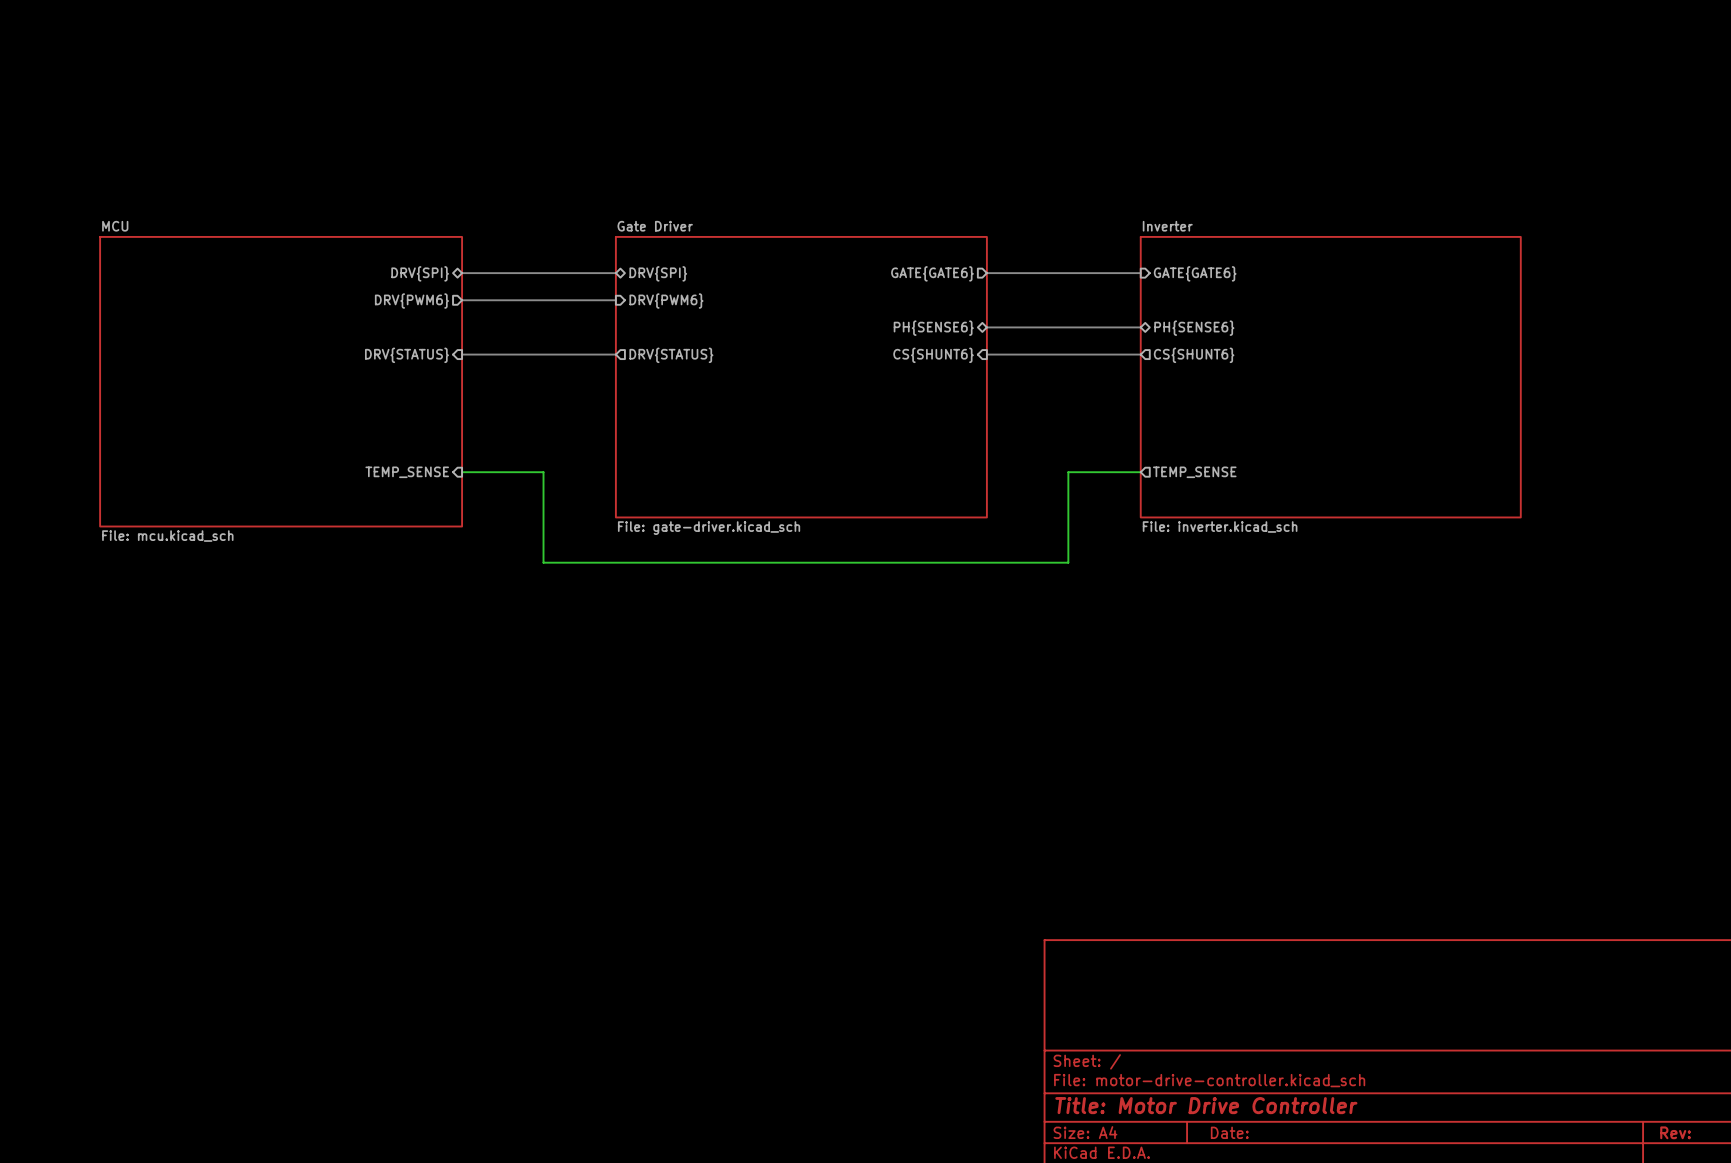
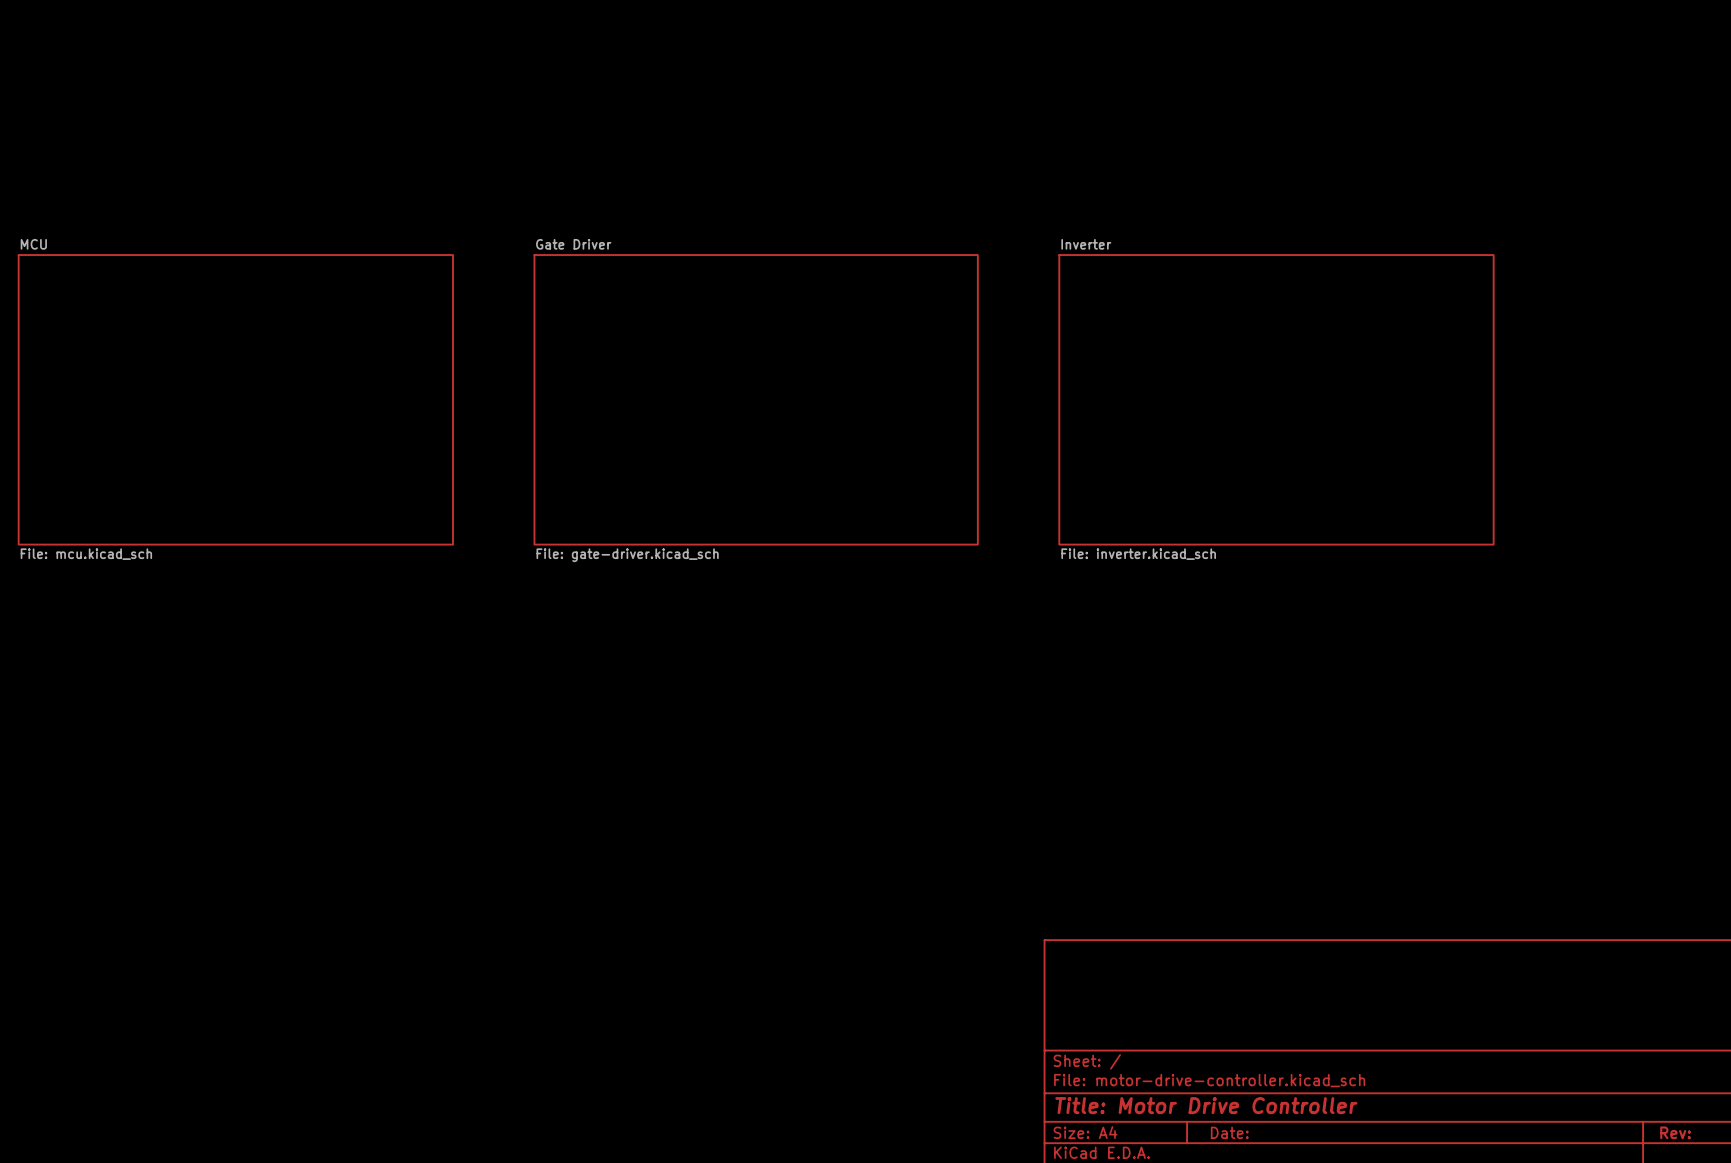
sheet pin: DRV{SPI} (420, 273) -> none
bus: (462, 273) (615, 273) -> none
sheet pin: DRV{SPI} (658, 273) -> none
sheet pin: GATE{GATE6} (932, 273) -> none
bus: (986, 273) (1140, 273) -> none
sheet pin: GATE{GATE6} (1195, 273) -> none
bus: (462, 300) (615, 300) -> none
sheet pin: DRV{PWM6} (411, 301) -> none
sheet pin: DRV{PWM6} (666, 301) -> none
bus: (986, 327) (1140, 327) -> none
sheet pin: PH{SENSE6} (933, 328) -> none
sheet pin: PH{SENSE6} (1194, 328) -> none
bus: (462, 354) (615, 354) -> none
bus: (986, 354) (1140, 354) -> none
sheet pin: DRV{STATUS} (406, 355) -> none
sheet pin: DRV{STATUS} (671, 355) -> none
sheet pin: CS{SHUNT6} (933, 355) -> none
sheet pin: CS{SHUNT6} (1194, 355) -> none
sheet Gate Driver: File: gate-driver.kicad_sch (801, 377) -> none
sheet Inverter: File: inverter.kicad_sch (1330, 377) -> none
sheet MCU: File: mcu.kicad_sch (281, 381) -> none
sheet MCU: none -> File: mcu.kicad_sch (235, 399)
sheet Gate Driver: none -> File: gate-driver.kicad_sch (756, 399)
sheet Inverter: none -> File: inverter.kicad_sch (1276, 399)
sheet pin: TEMP_SENSE (407, 472) -> none
wire: (462, 472) (543, 472) (543, 562) (1068, 562) (1068, 472) (1140, 472) -> none
sheet pin: TEMP_SENSE (1194, 472) -> none

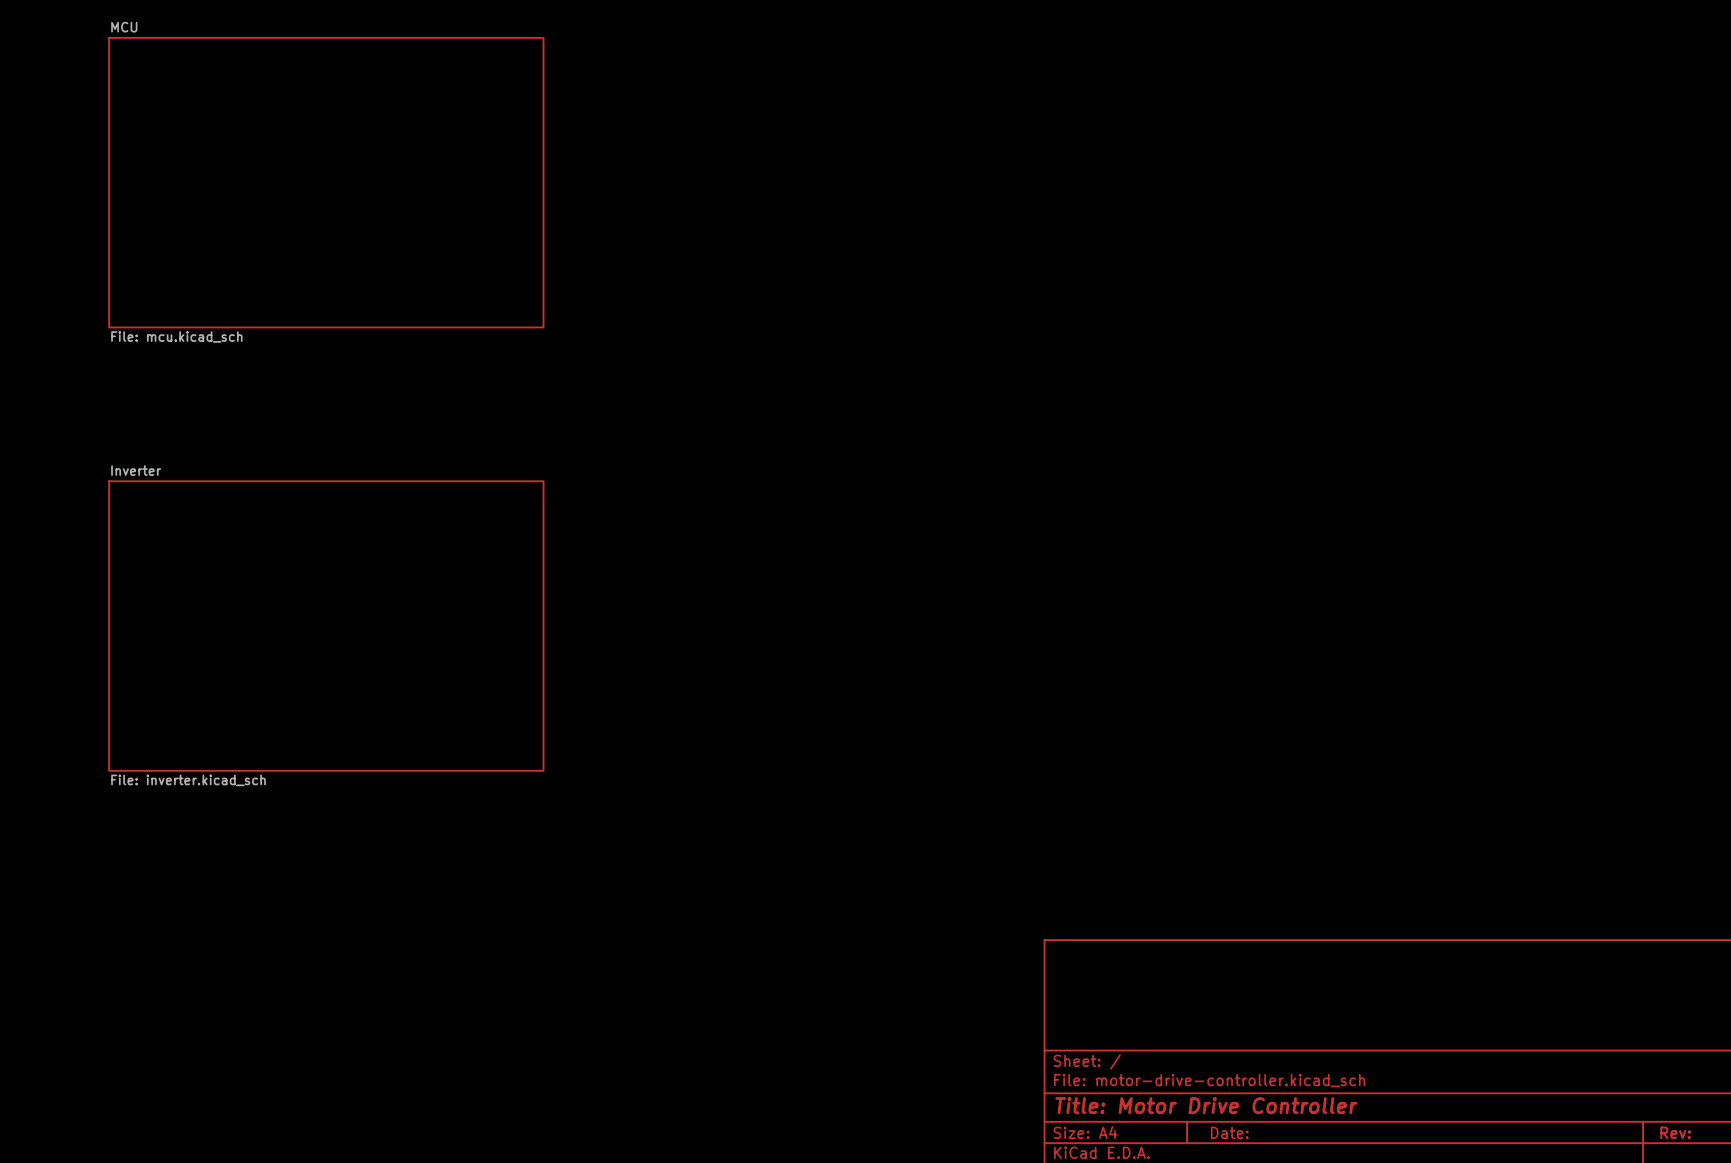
sheet MCU: none -> File: mcu.kicad_sch (326, 182)
sheet MCU: File: mcu.kicad_sch (235, 399) -> none
sheet Gate Driver: File: gate-driver.kicad_sch (756, 399) -> none
sheet Inverter: File: inverter.kicad_sch (1276, 399) -> none
sheet Inverter: none -> File: inverter.kicad_sch (326, 626)

